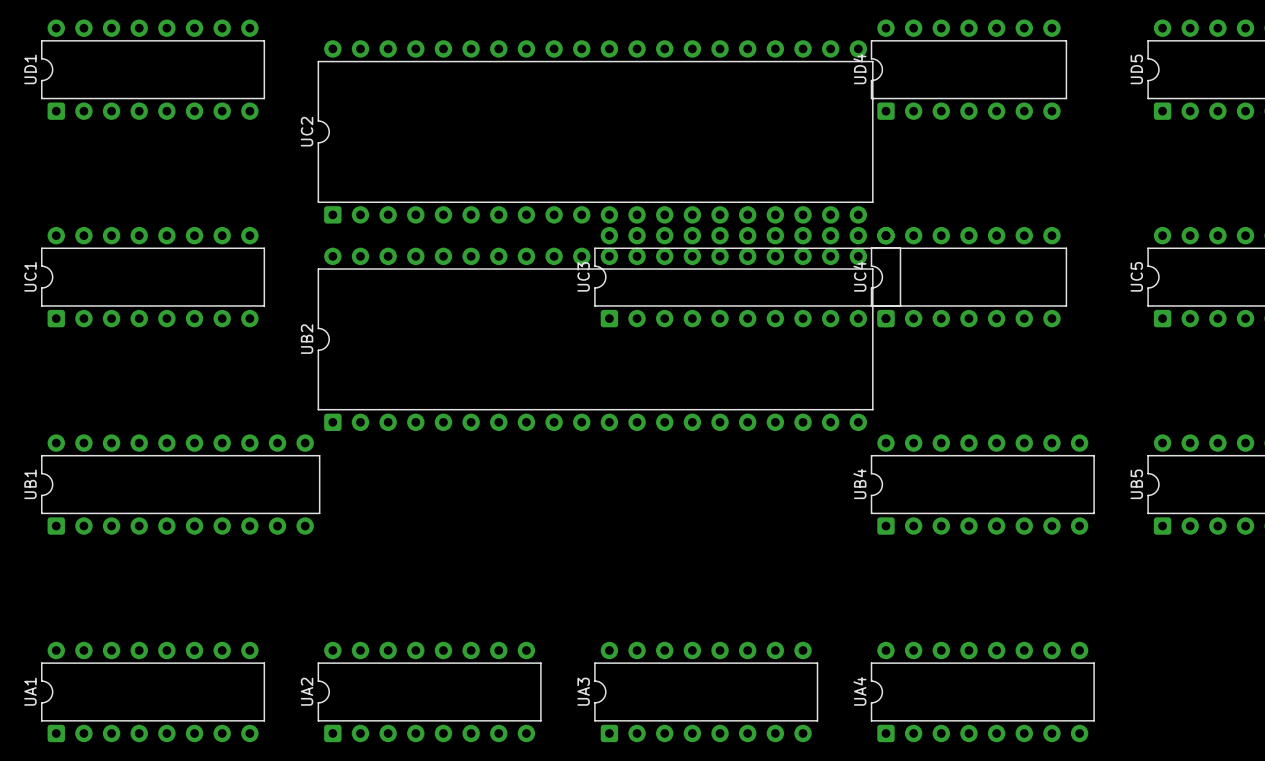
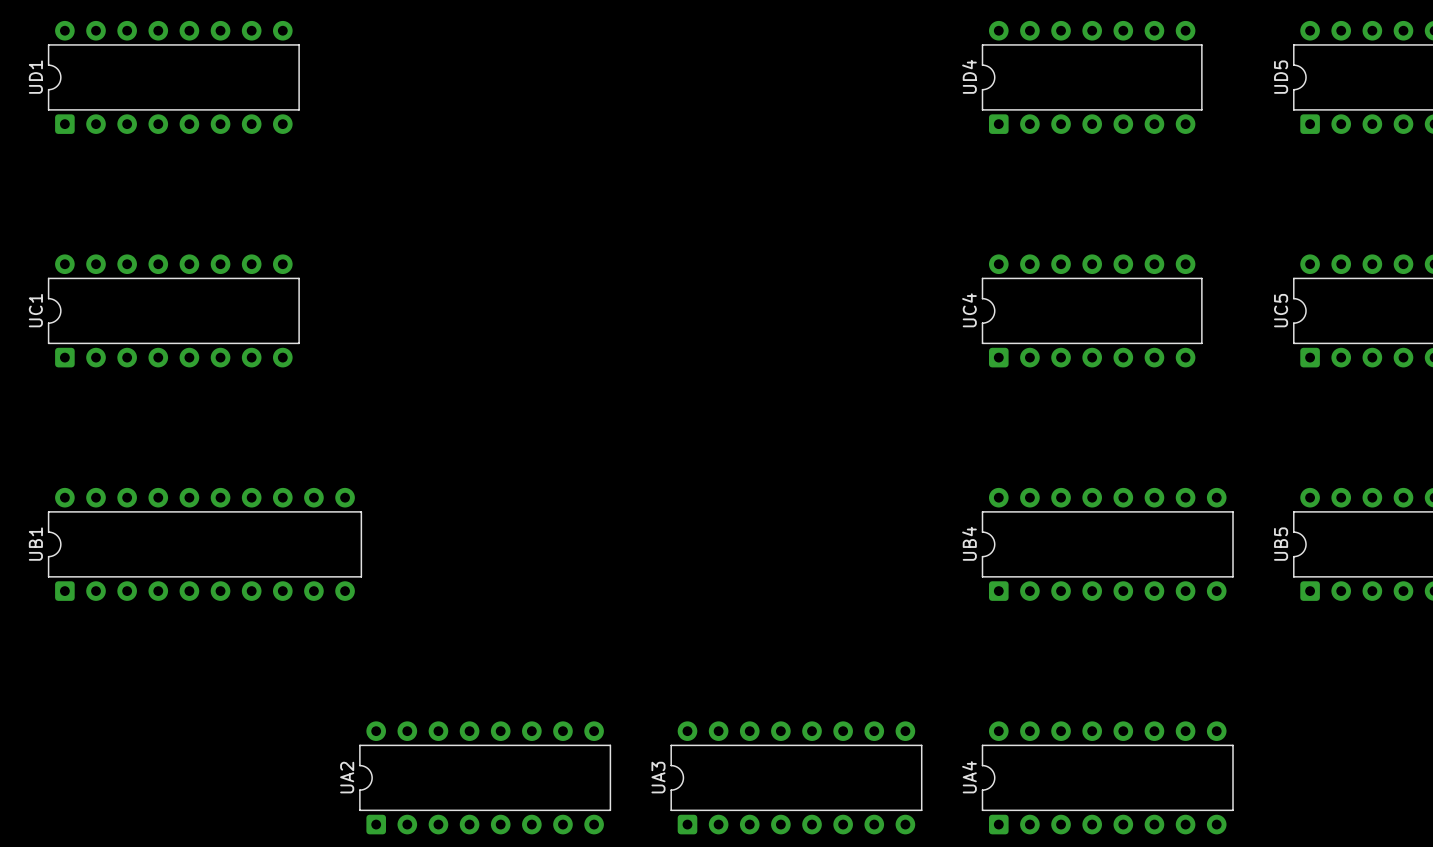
UC2: (595, 131) -> none
UC3: (747, 277) -> none
UB2: (595, 339) -> none
UA1: (153, 691) -> none

